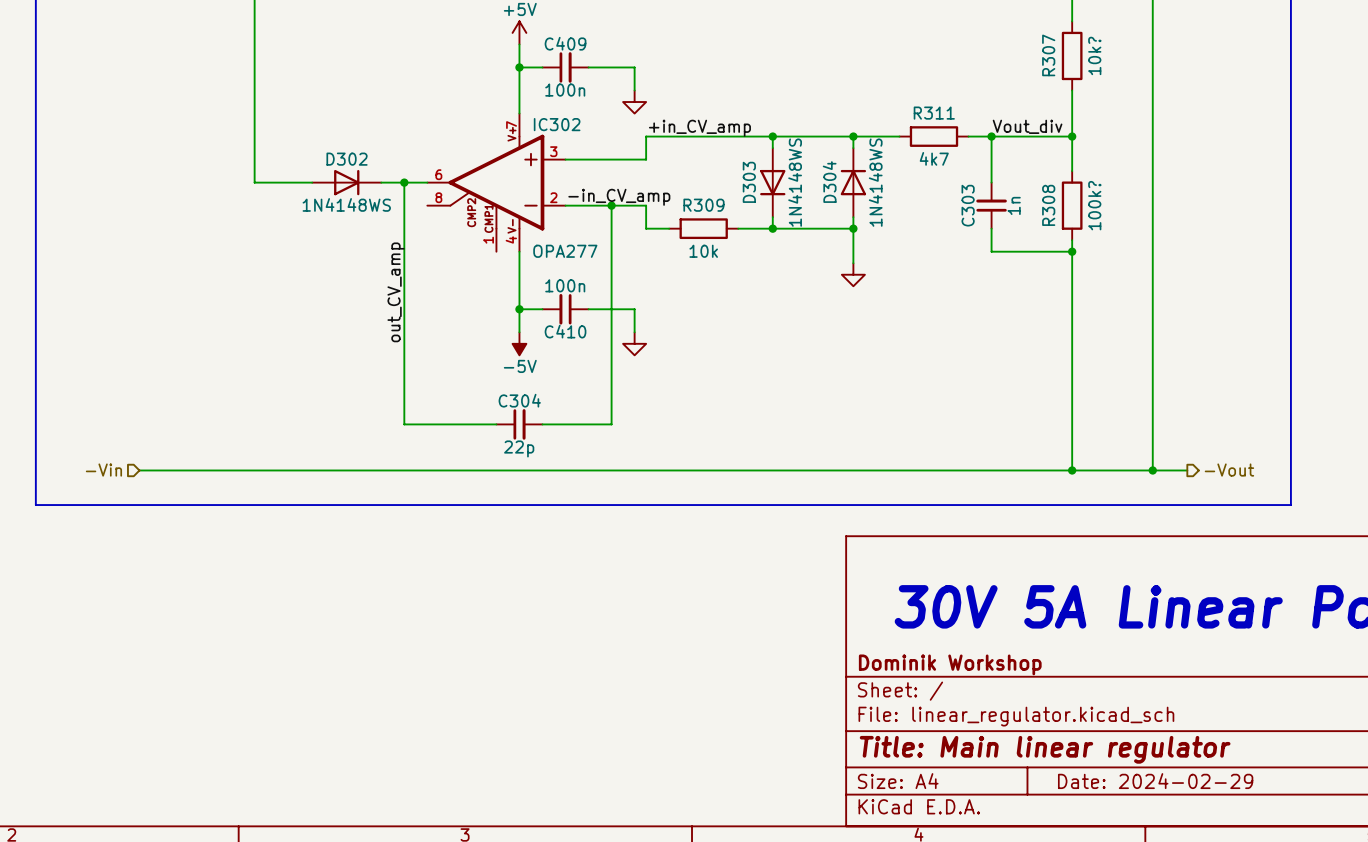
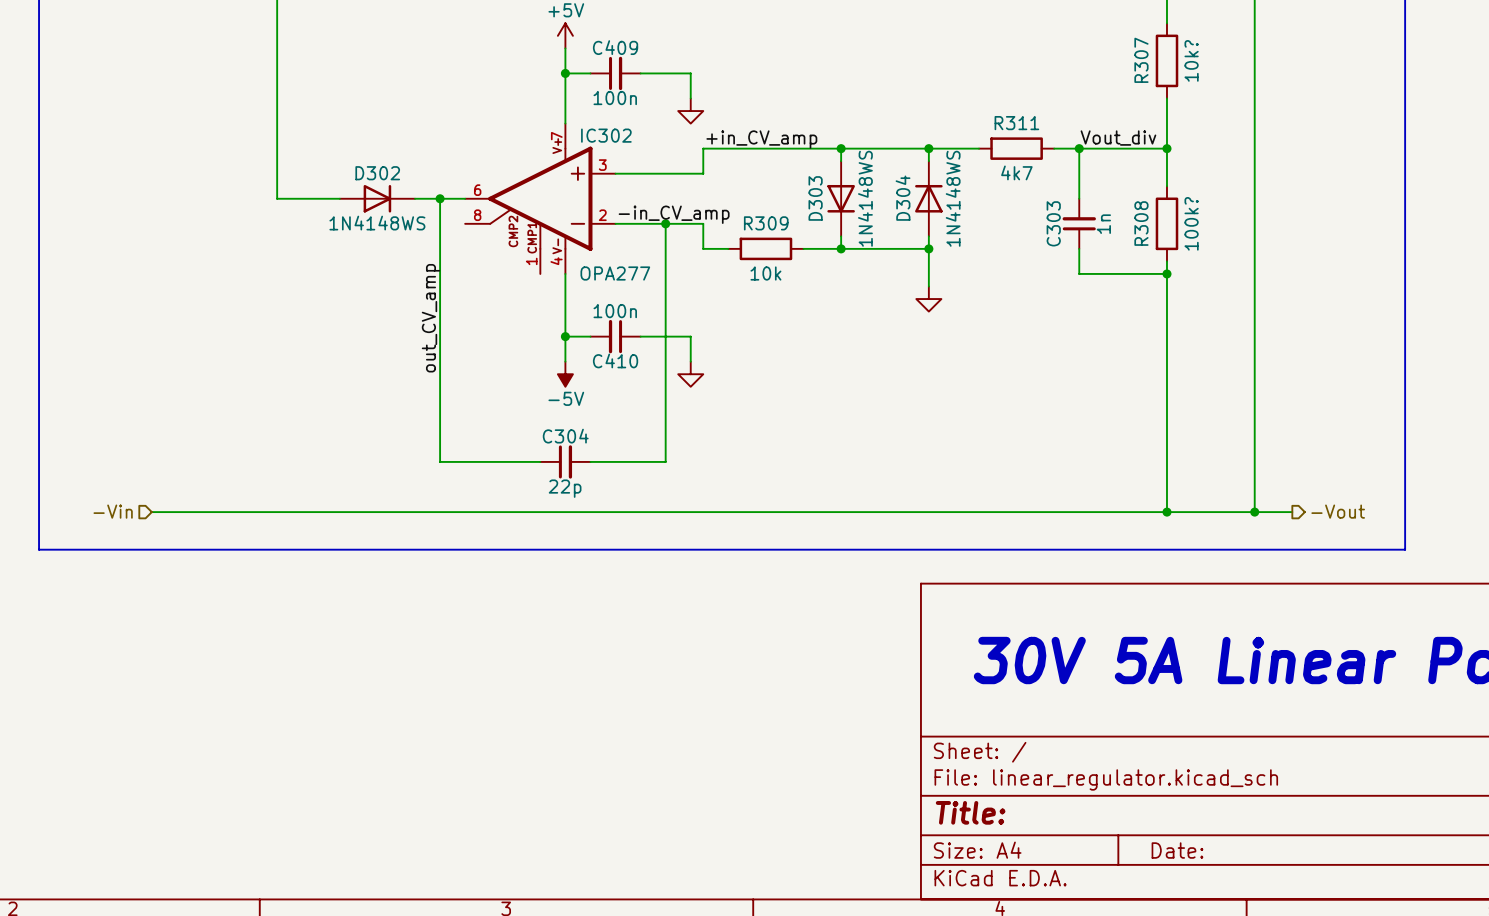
title block: Dominik Workshop (950, 664) -> none
title block: Title: Main linear regulator (1045, 749) -> Title: (970, 812)
title block: Date: 2024-02-29 (1155, 781) -> Date: (1177, 850)

